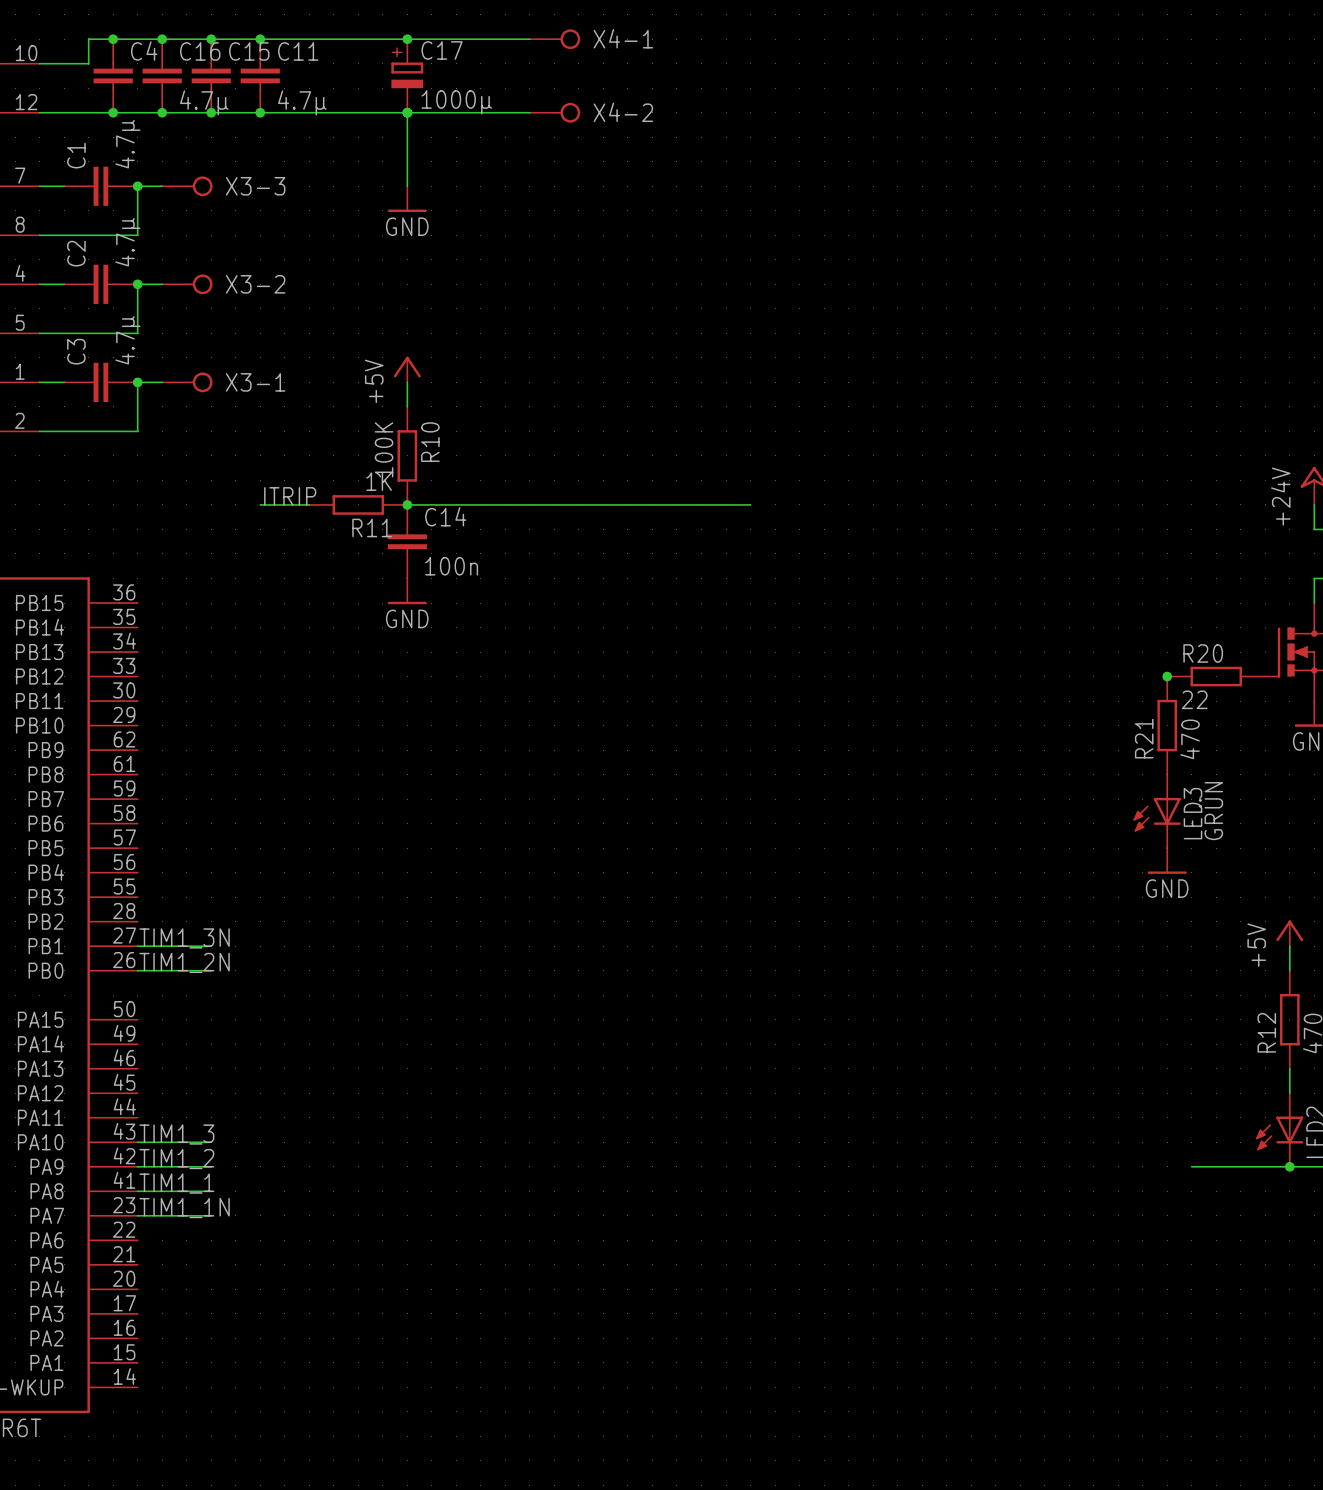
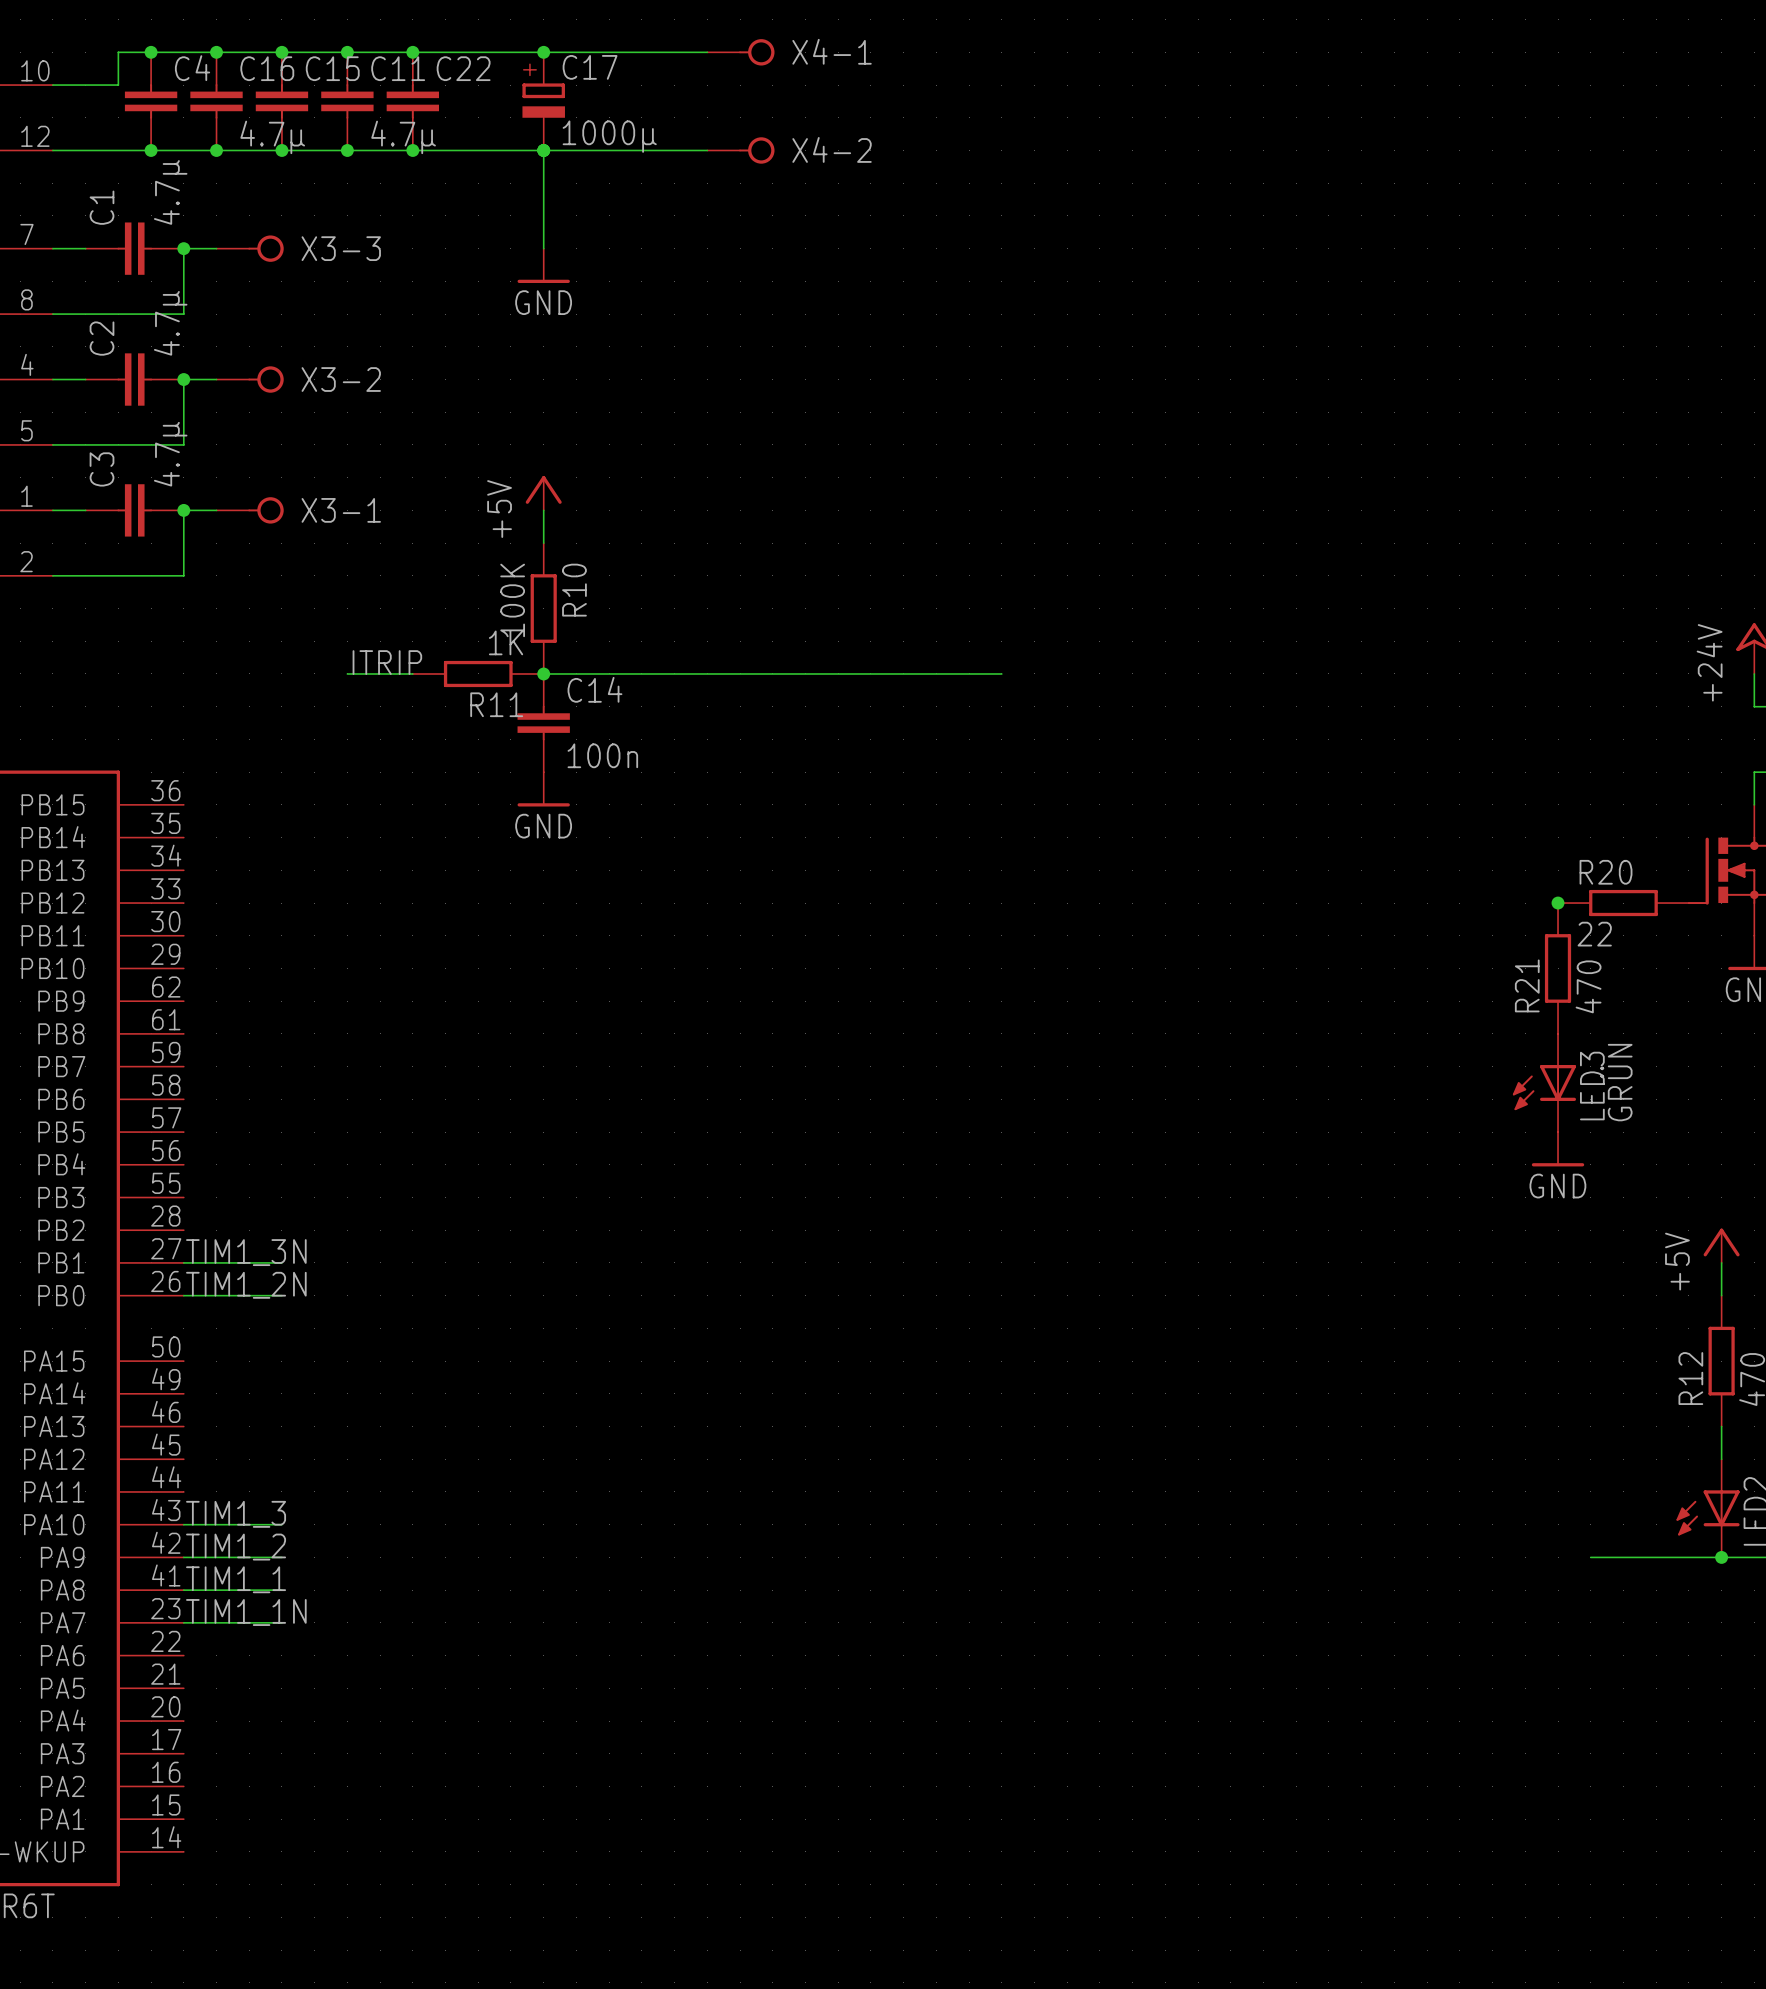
junction: none -> (412, 52)
C22: none -> (412, 101)
junction: none -> (412, 150)

